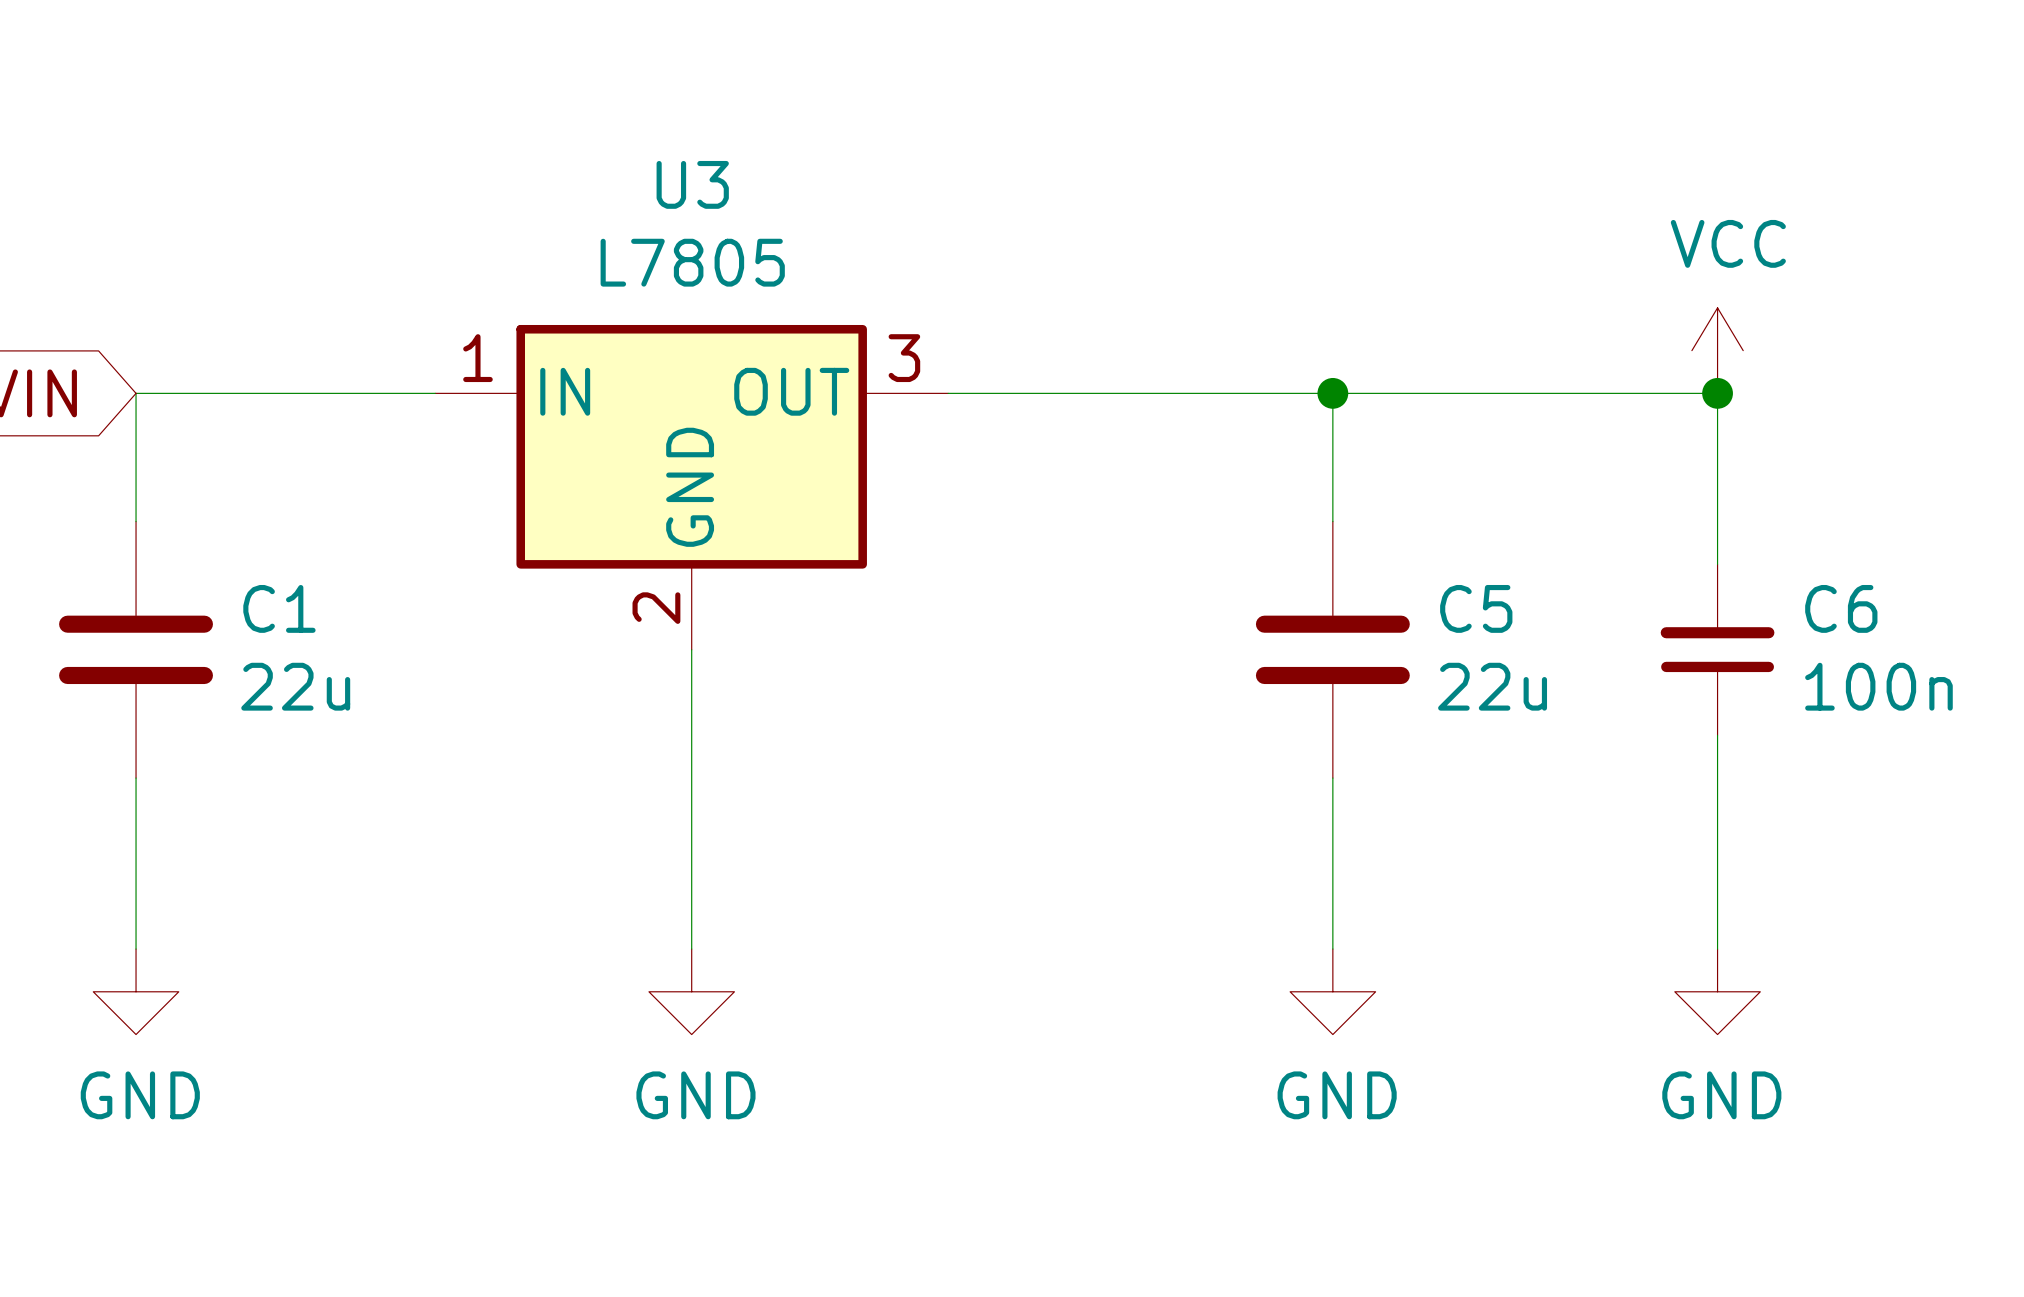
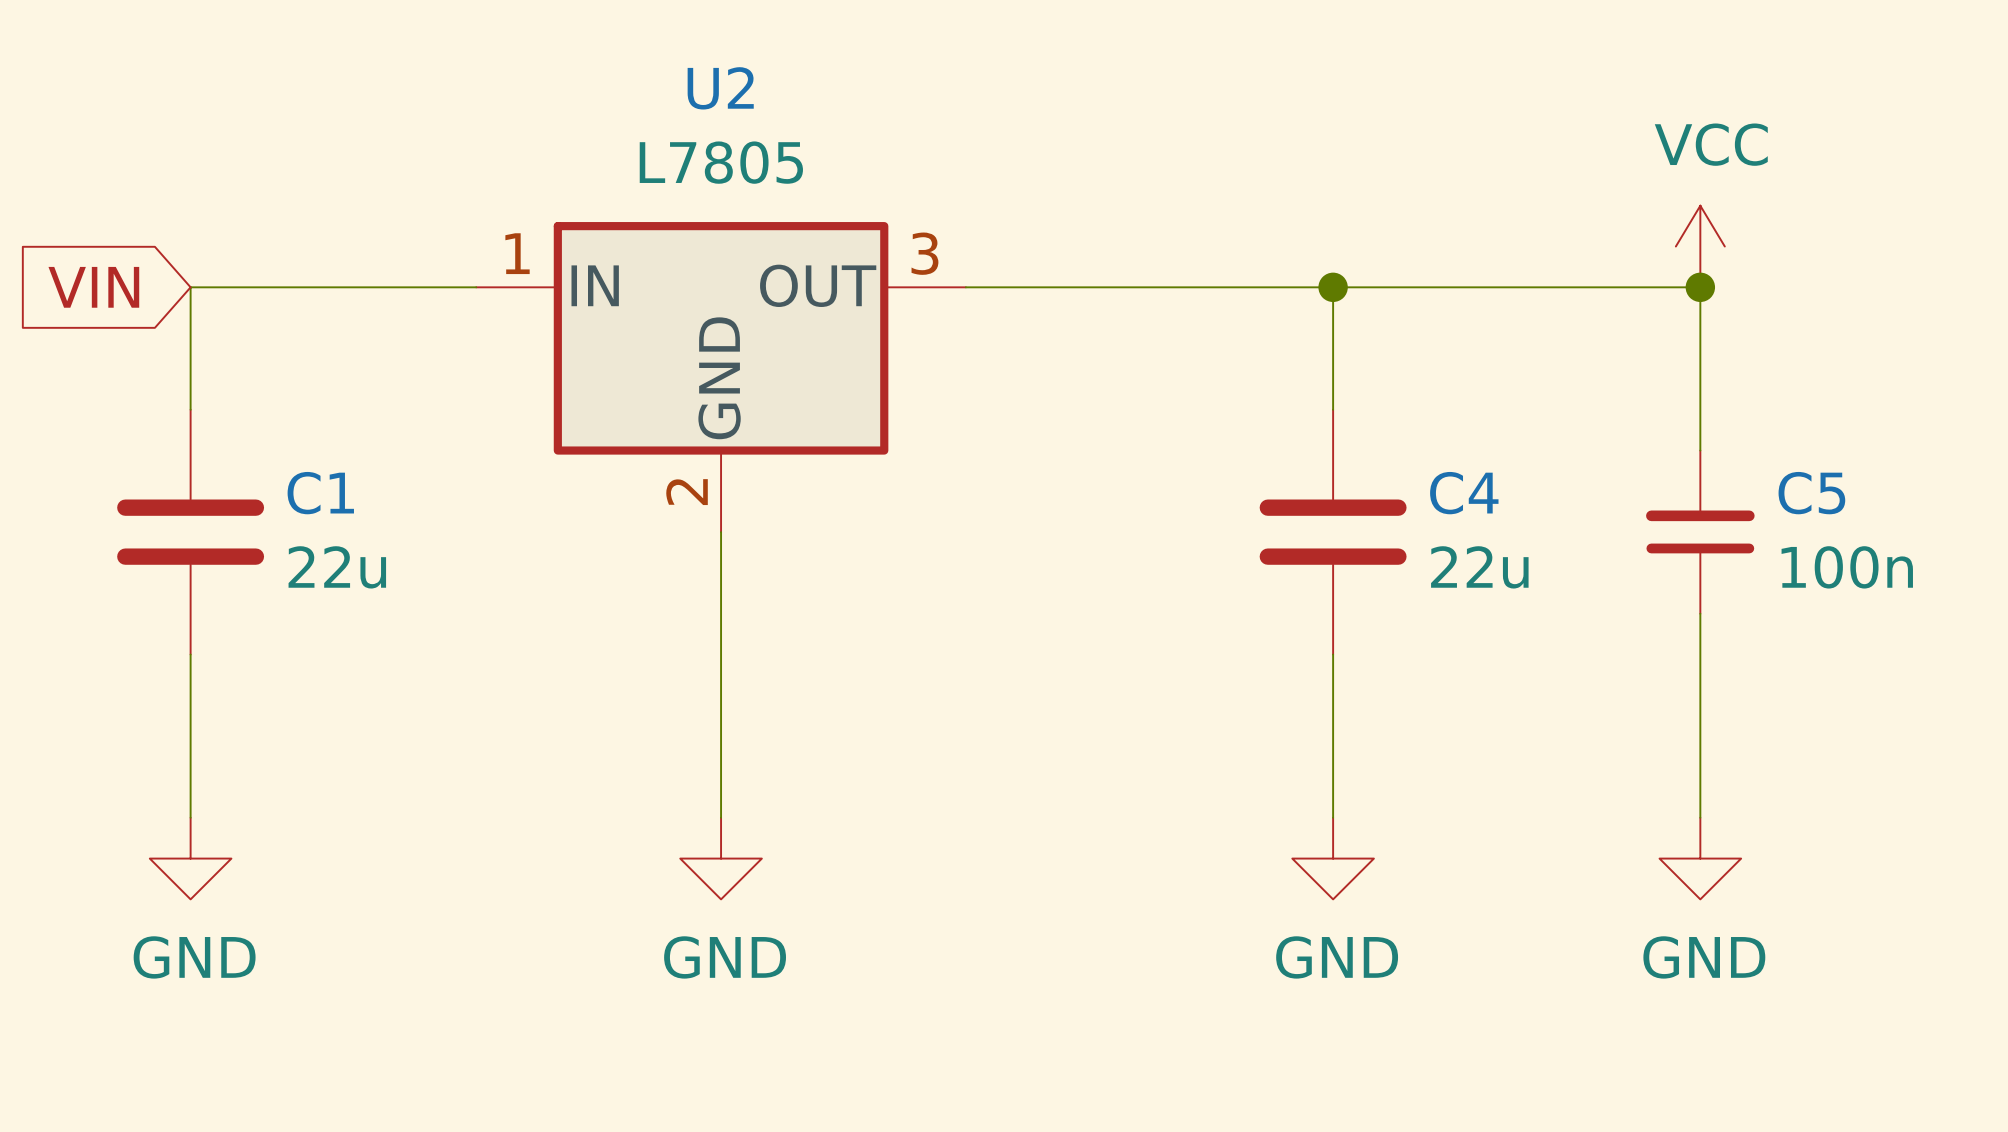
U3 name: U3 (692, 184) -> U2 (720, 88)
C5 name: C5 (1476, 608) -> C4 (1464, 493)
C6 name: C6 (1841, 608) -> C5 (1811, 493)

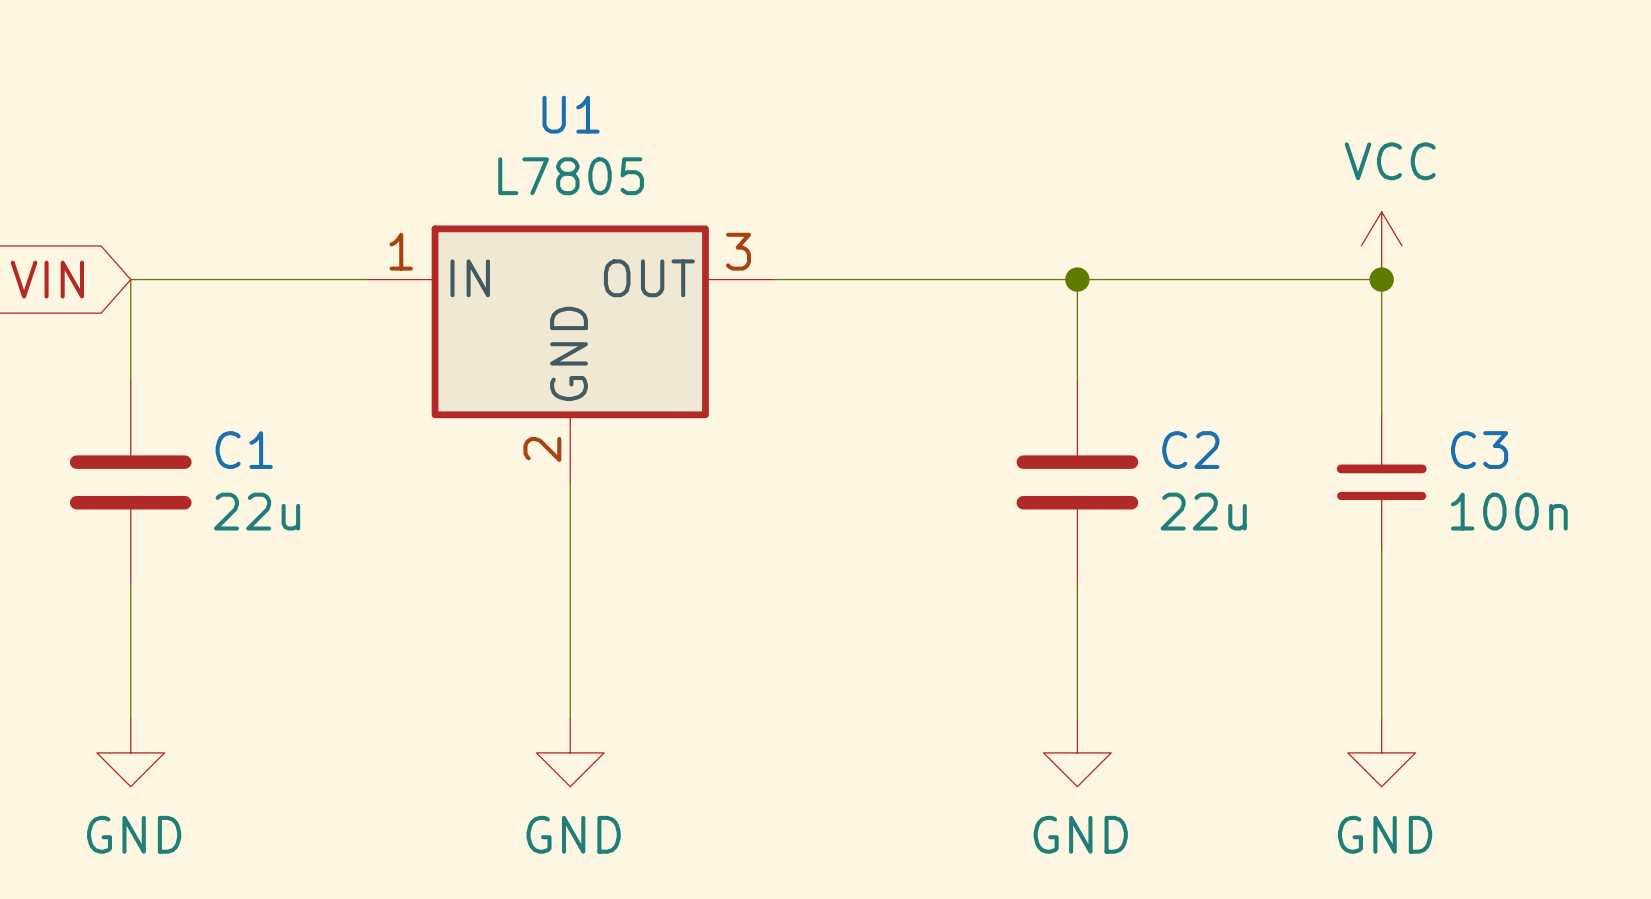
U2 name: U2 (720, 88) -> U1 (571, 114)
C4 name: C4 (1464, 493) -> C2 (1190, 450)
C5 name: C5 (1811, 493) -> C3 (1479, 450)

